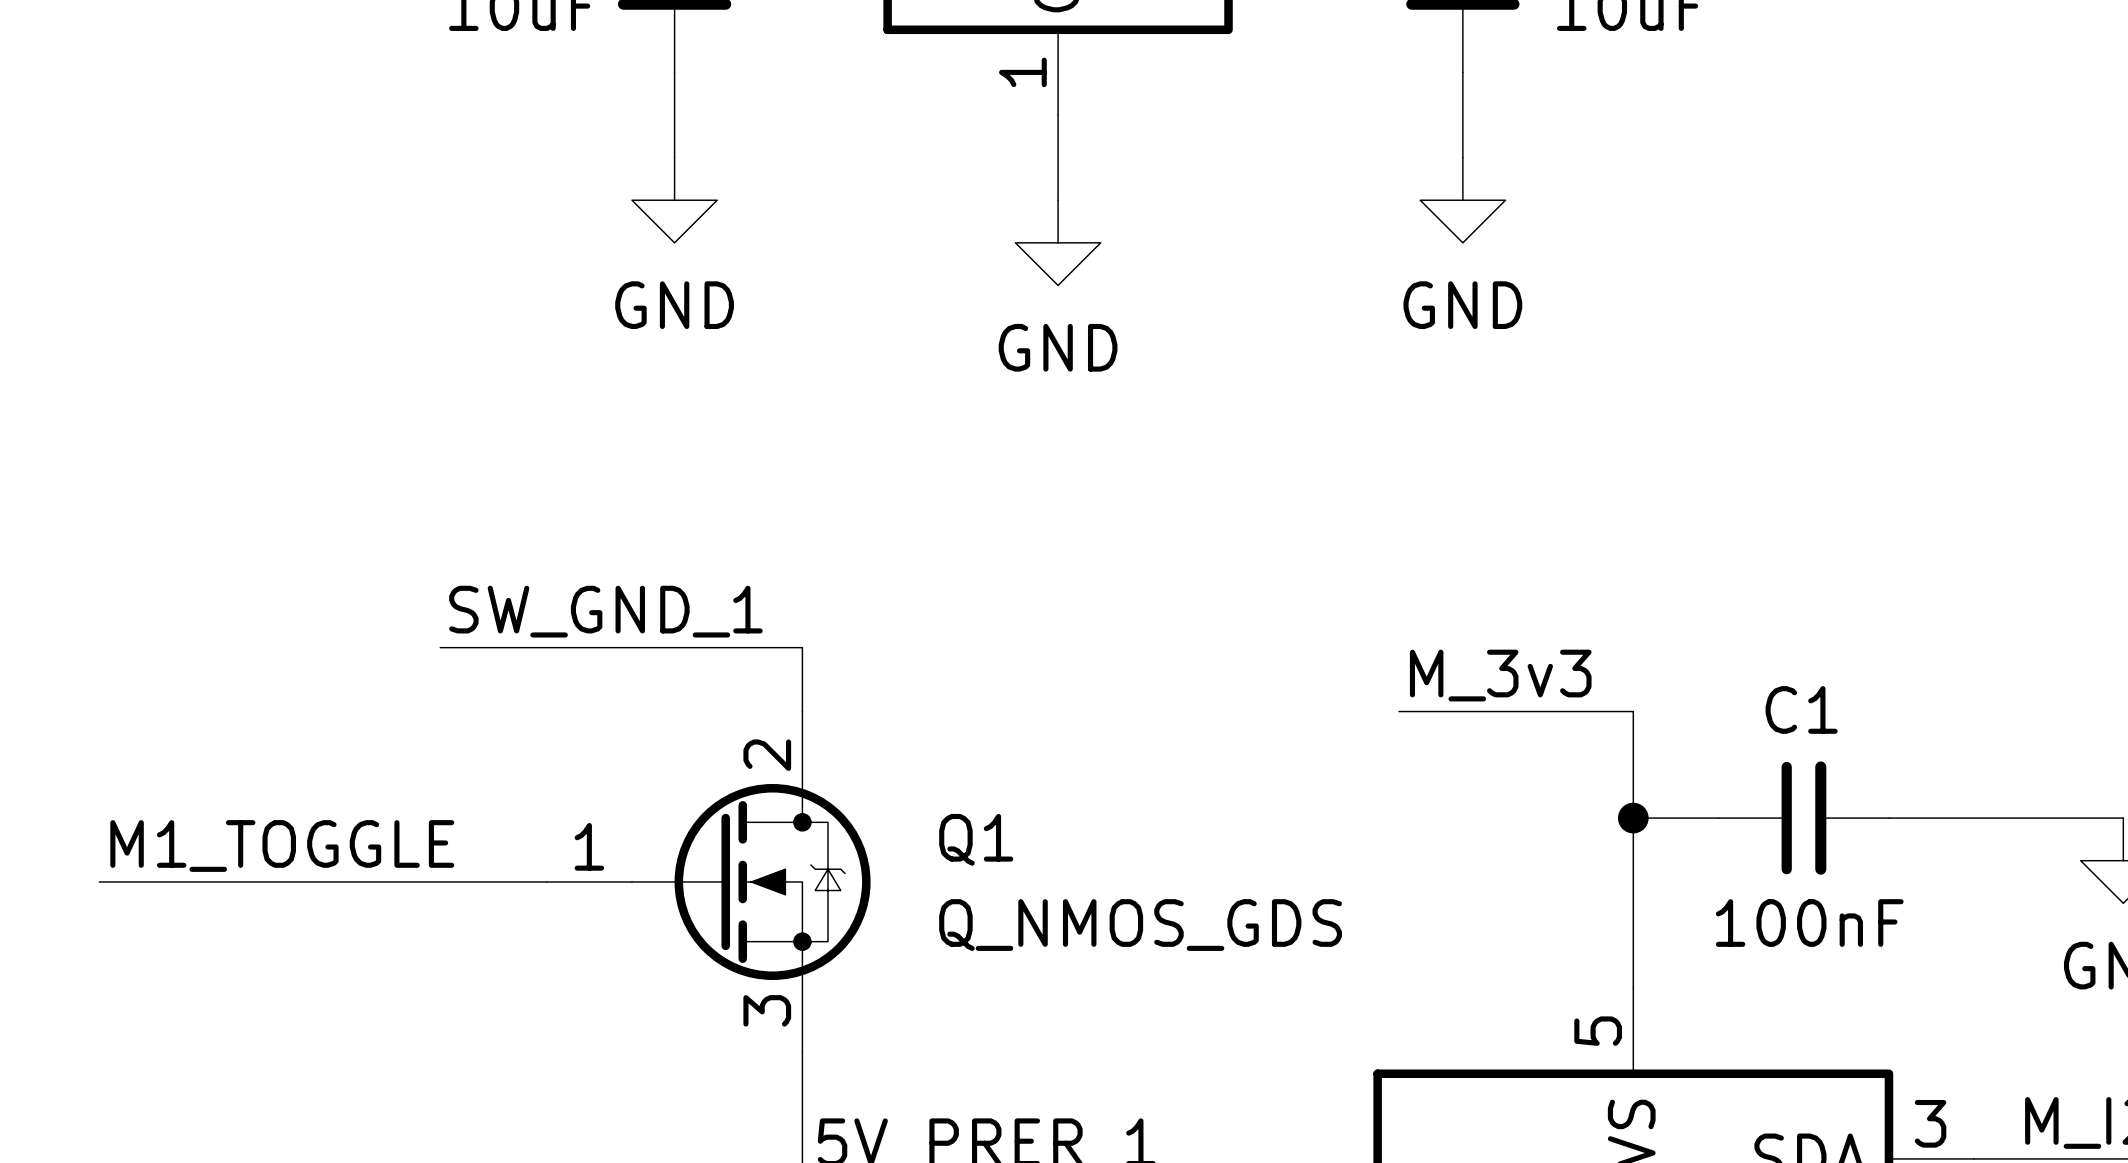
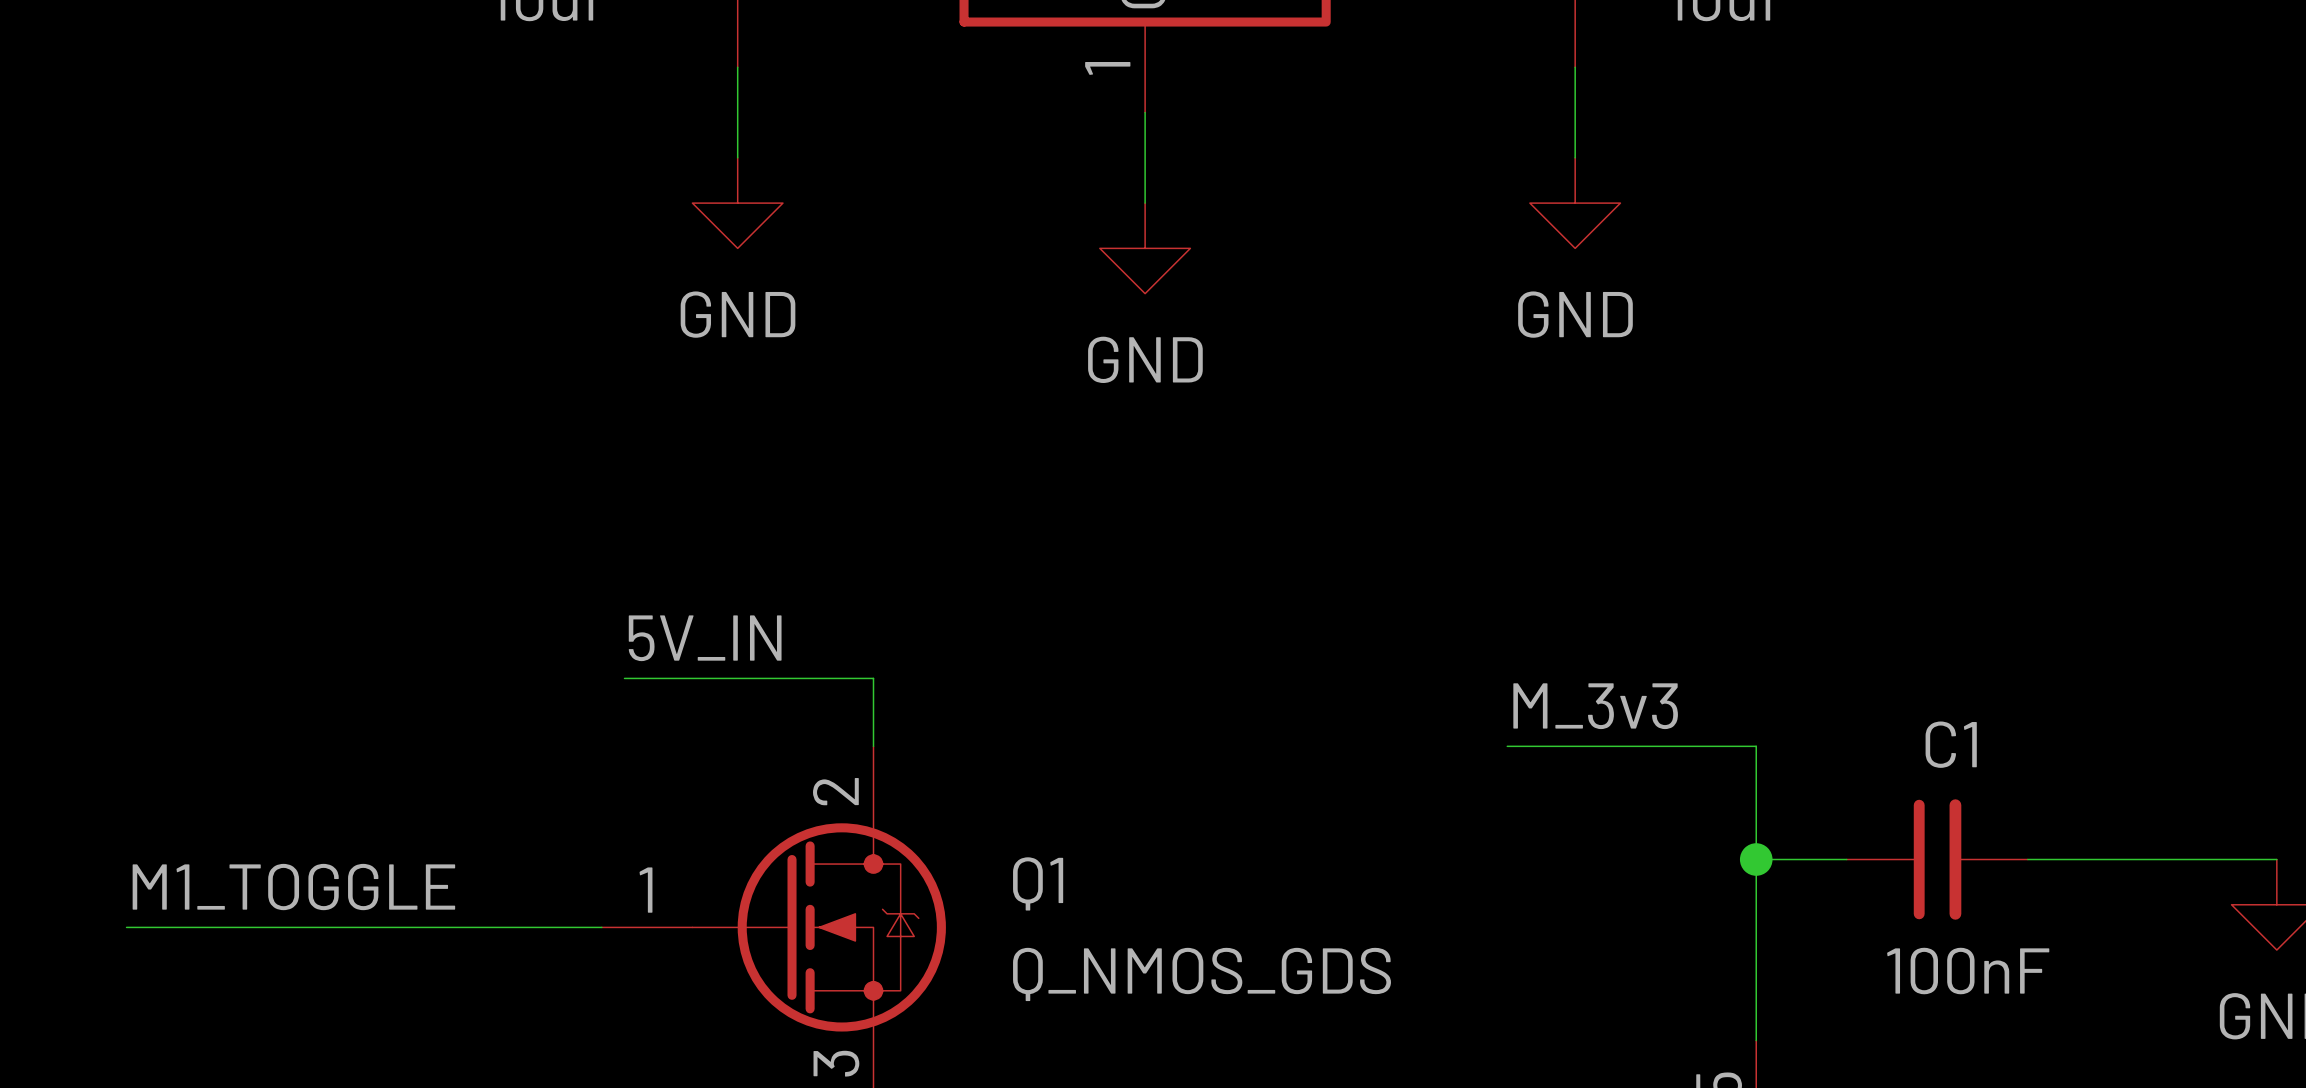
label: SW_GND_1 (605, 611) -> none
label: none -> 5V_IN (705, 638)
wire: (440, 647) (568, 647) -> none

